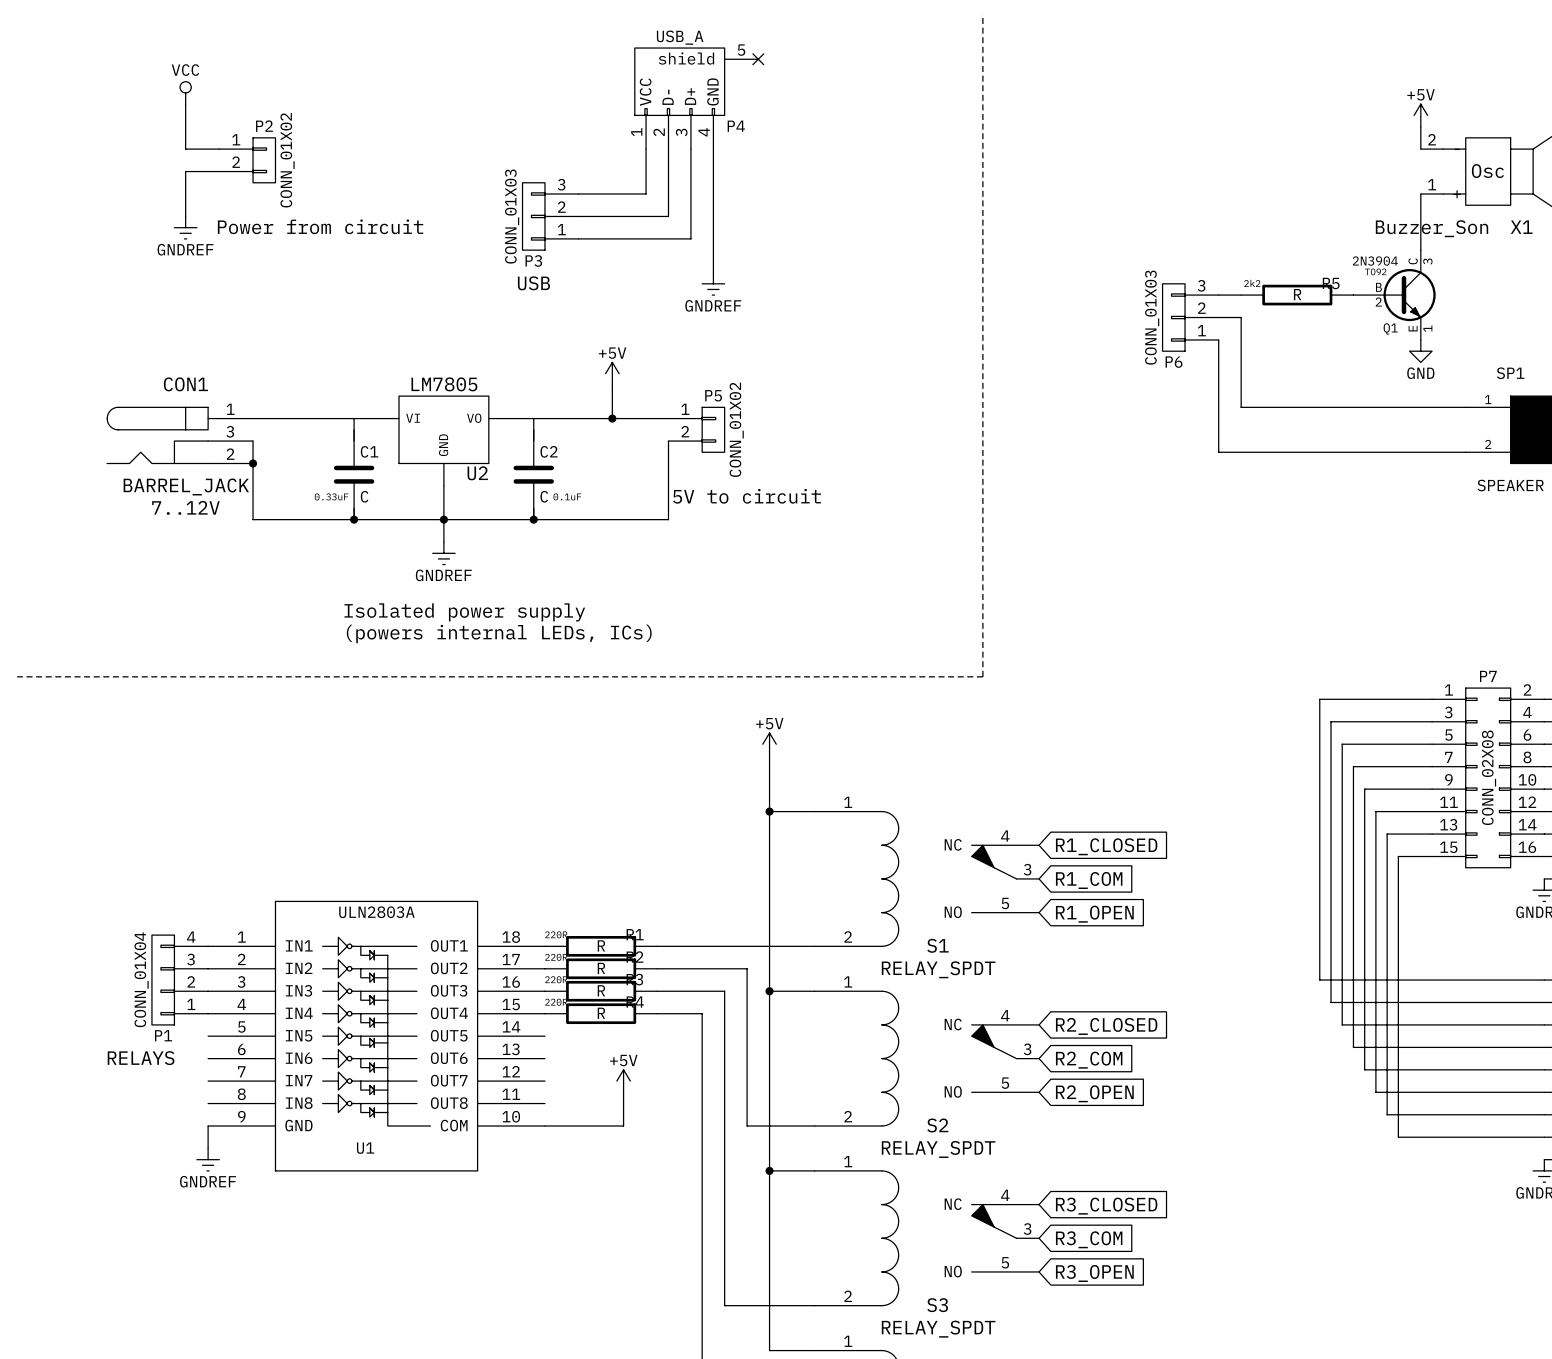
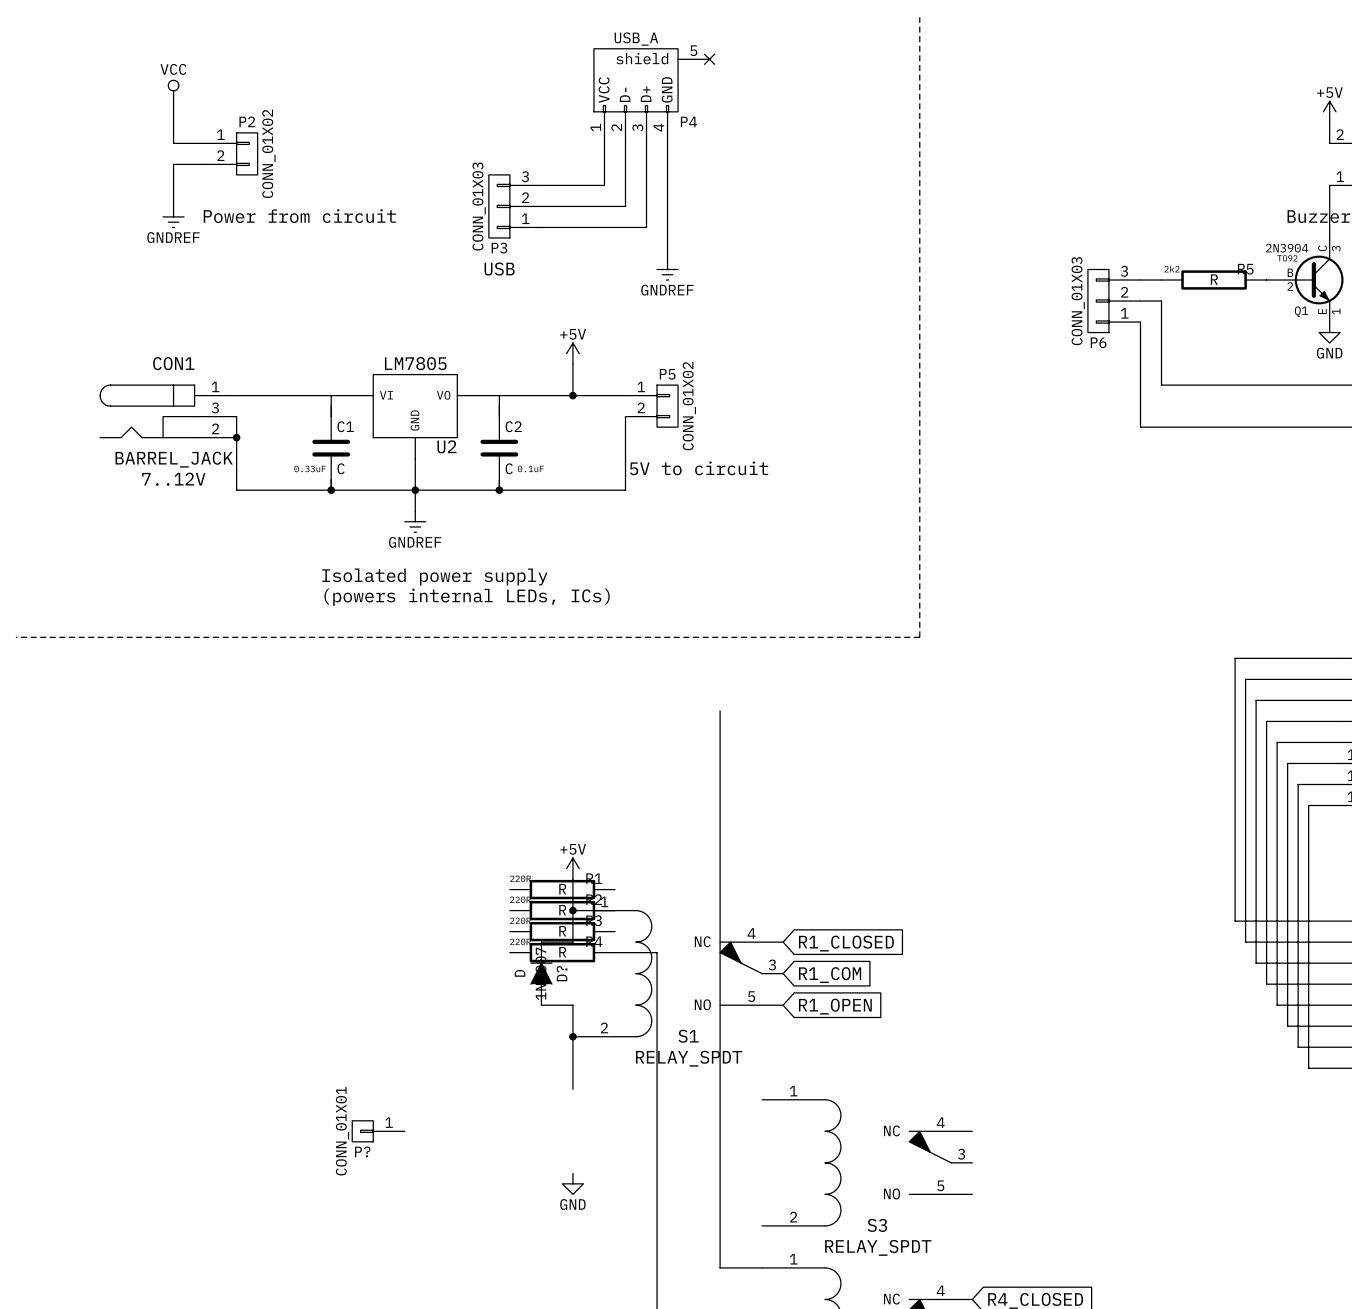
power symbol: +5V (769, 744) -> none
wire: (769, 811) (814, 811) -> none
junction: (769, 811) -> none
global label: R1_CLOSED (1106, 846) -> none
S1 position: (926, 878) -> (678, 973)
global label: R1_COM (1089, 880) -> none
global label: R1_OPEN (1094, 914) -> none
power symbol: none -> +5V (572, 868)
wire: none -> (572, 879) (572, 942) (541, 942)
wire: (657, 946) (814, 946) -> none
junction: none -> (572, 910)
wire: (657, 968) (747, 968) (747, 1125) (814, 1125) -> none
P1: CONN_01X04 (180, 980) -> none
wire: (657, 991) (724, 991) (724, 1305) (814, 1305) -> none
wire: (769, 991) (814, 991) -> none
junction: (769, 991) -> none
global label: none -> R1_CLOSED (846, 943)
global label: R2_CLOSED (1106, 1026) -> none
U1: ULN2803A (376, 1036) -> none
D?: none -> D (541, 973)
global label: none -> R1_COM (830, 975)
S2: RELAY_SPDT (926, 1058) -> none
global label: R2_COM (1089, 1060) -> none
wire: none -> (541, 1005) (572, 1005) (572, 1089)
global label: none -> R1_OPEN (835, 1006)
power symbol: +5V (623, 1081) -> none
wire: (623, 1092) (623, 1125) (544, 1125) -> none
global label: R2_OPEN (1094, 1093) -> none
junction: none -> (572, 1036)
wire: (208, 1125) (208, 1148) -> none
power symbol: GNDREF (208, 1159) -> none
wire: (769, 1170) (814, 1170) -> none
junction: (769, 1170) -> none
P?: none -> CONN_01X01 (378, 1131)
global label: R3_CLOSED (1106, 1206) -> none
global label: R3_COM (1089, 1239) -> none
power symbol: none -> GND (572, 1183)
global label: R3_OPEN (1094, 1273) -> none

